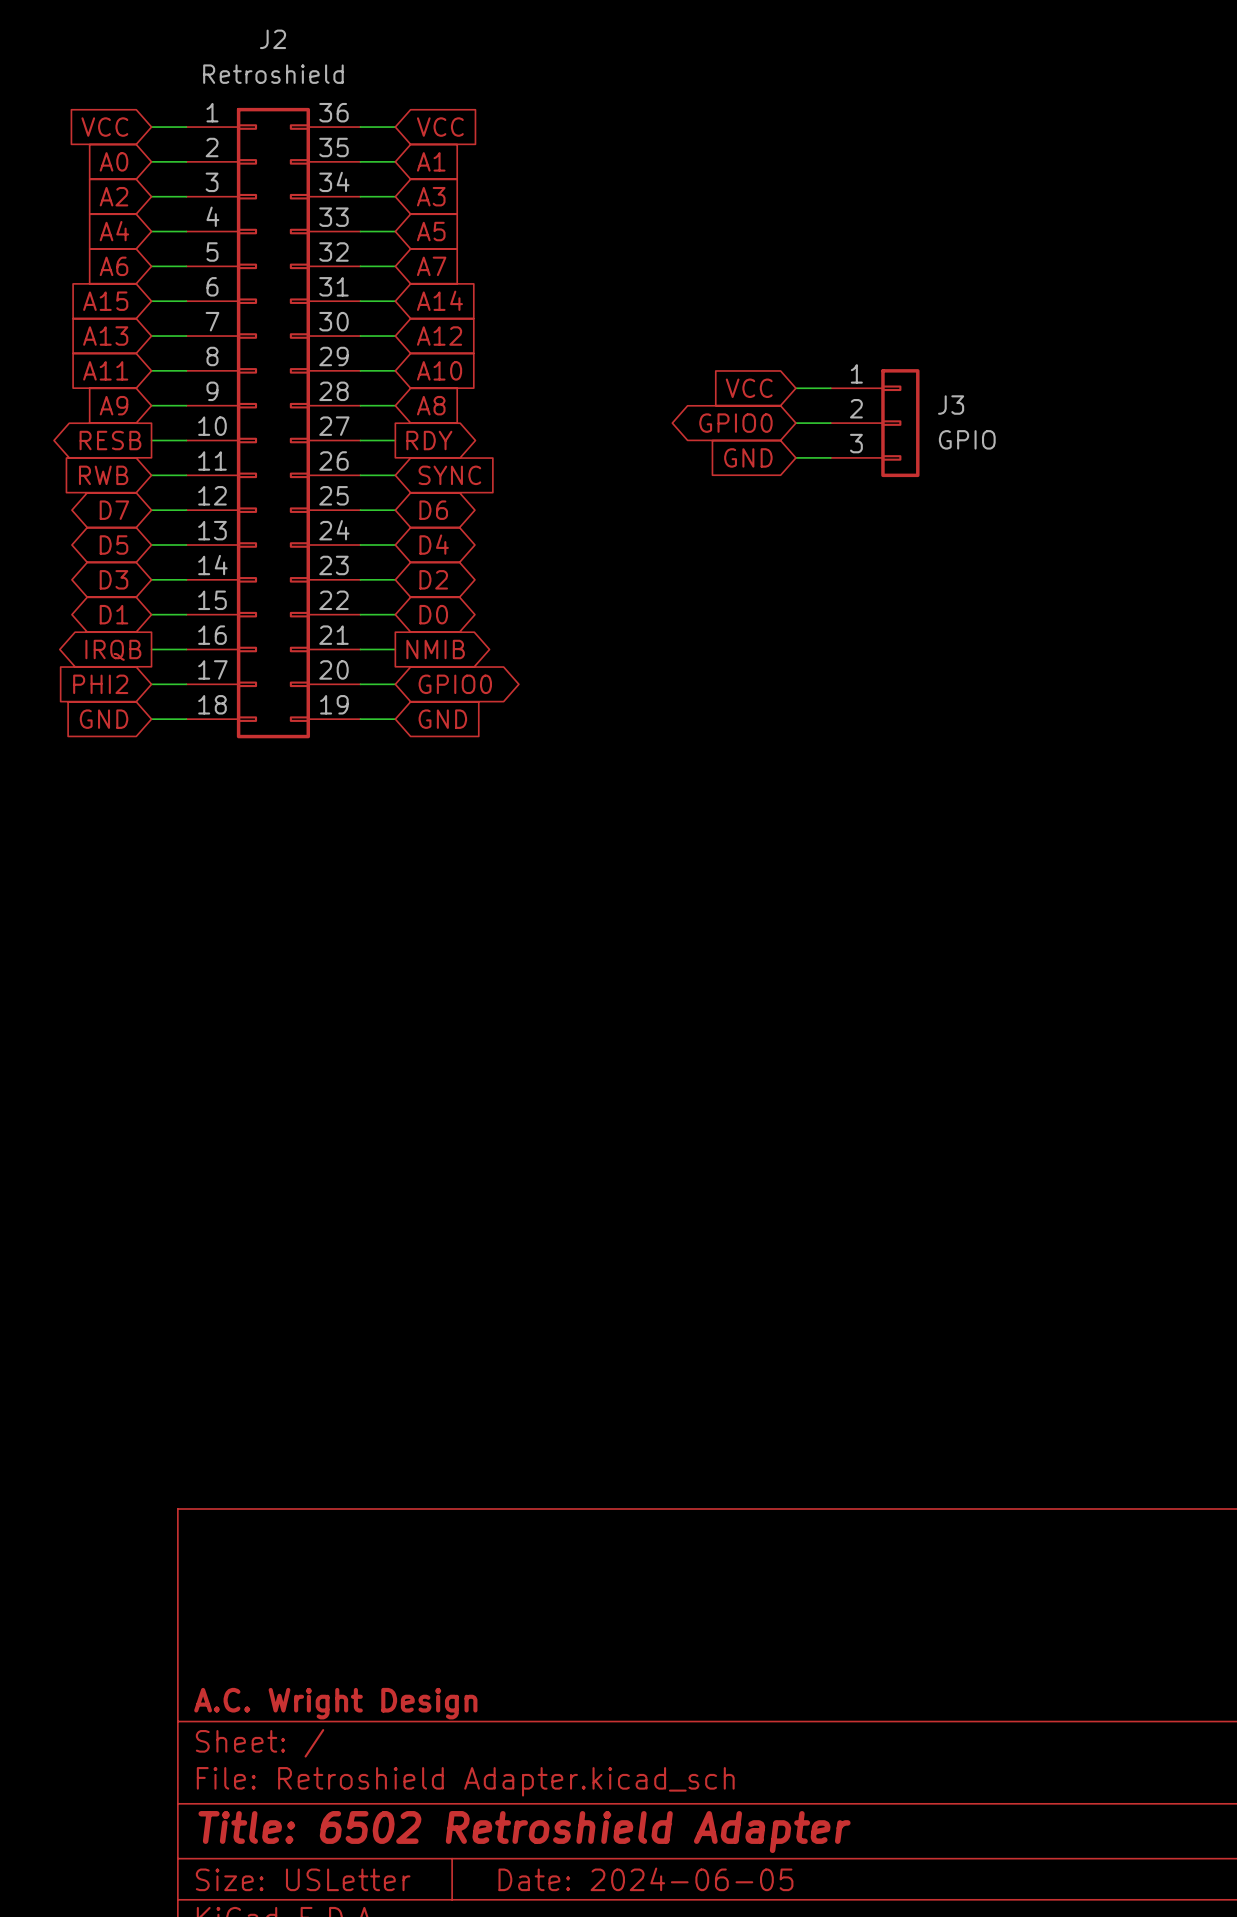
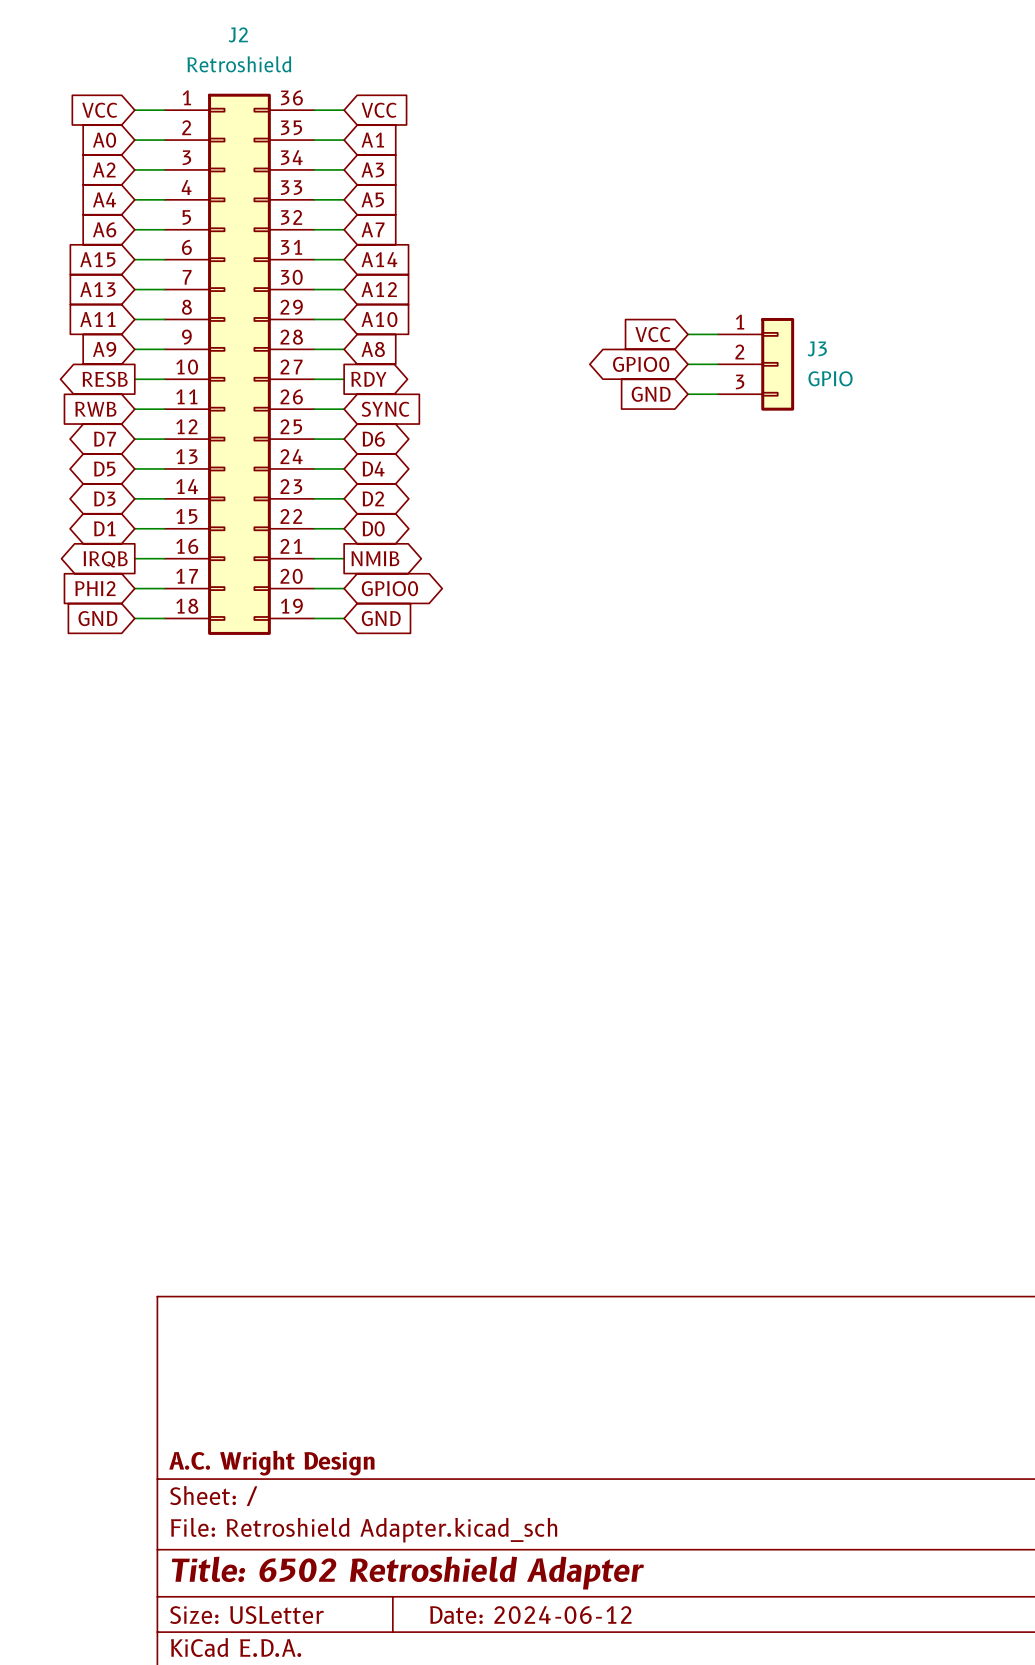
title block: Date: 2024-06-05 (645, 1879) -> Date: 2024-06-12 (530, 1615)

